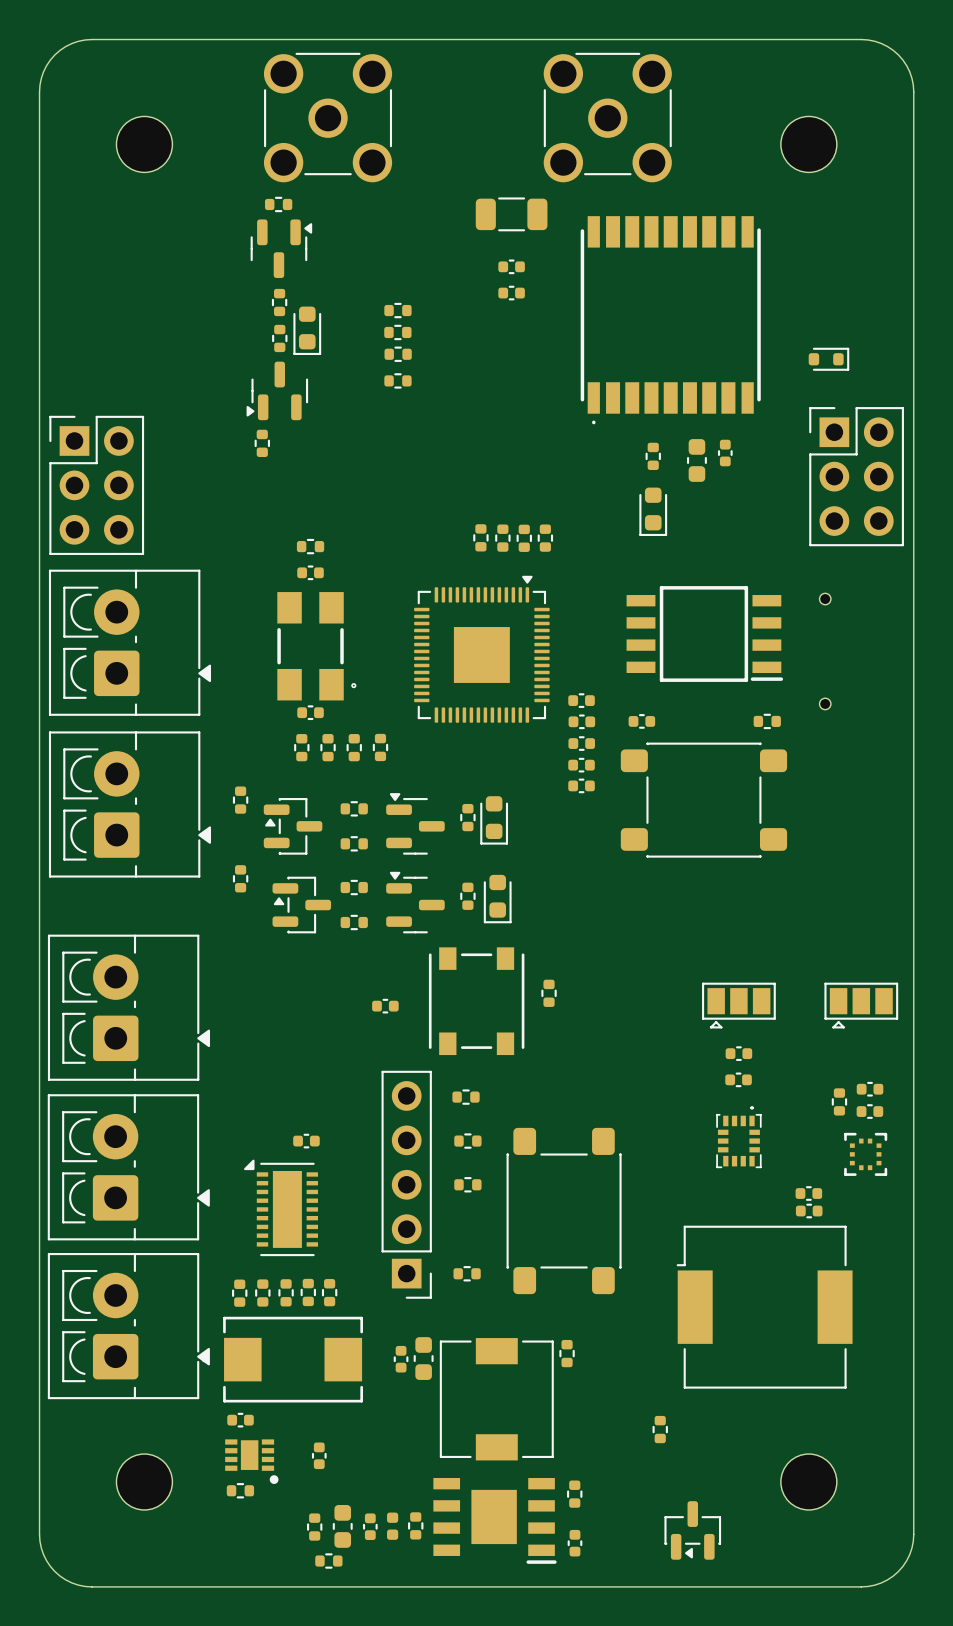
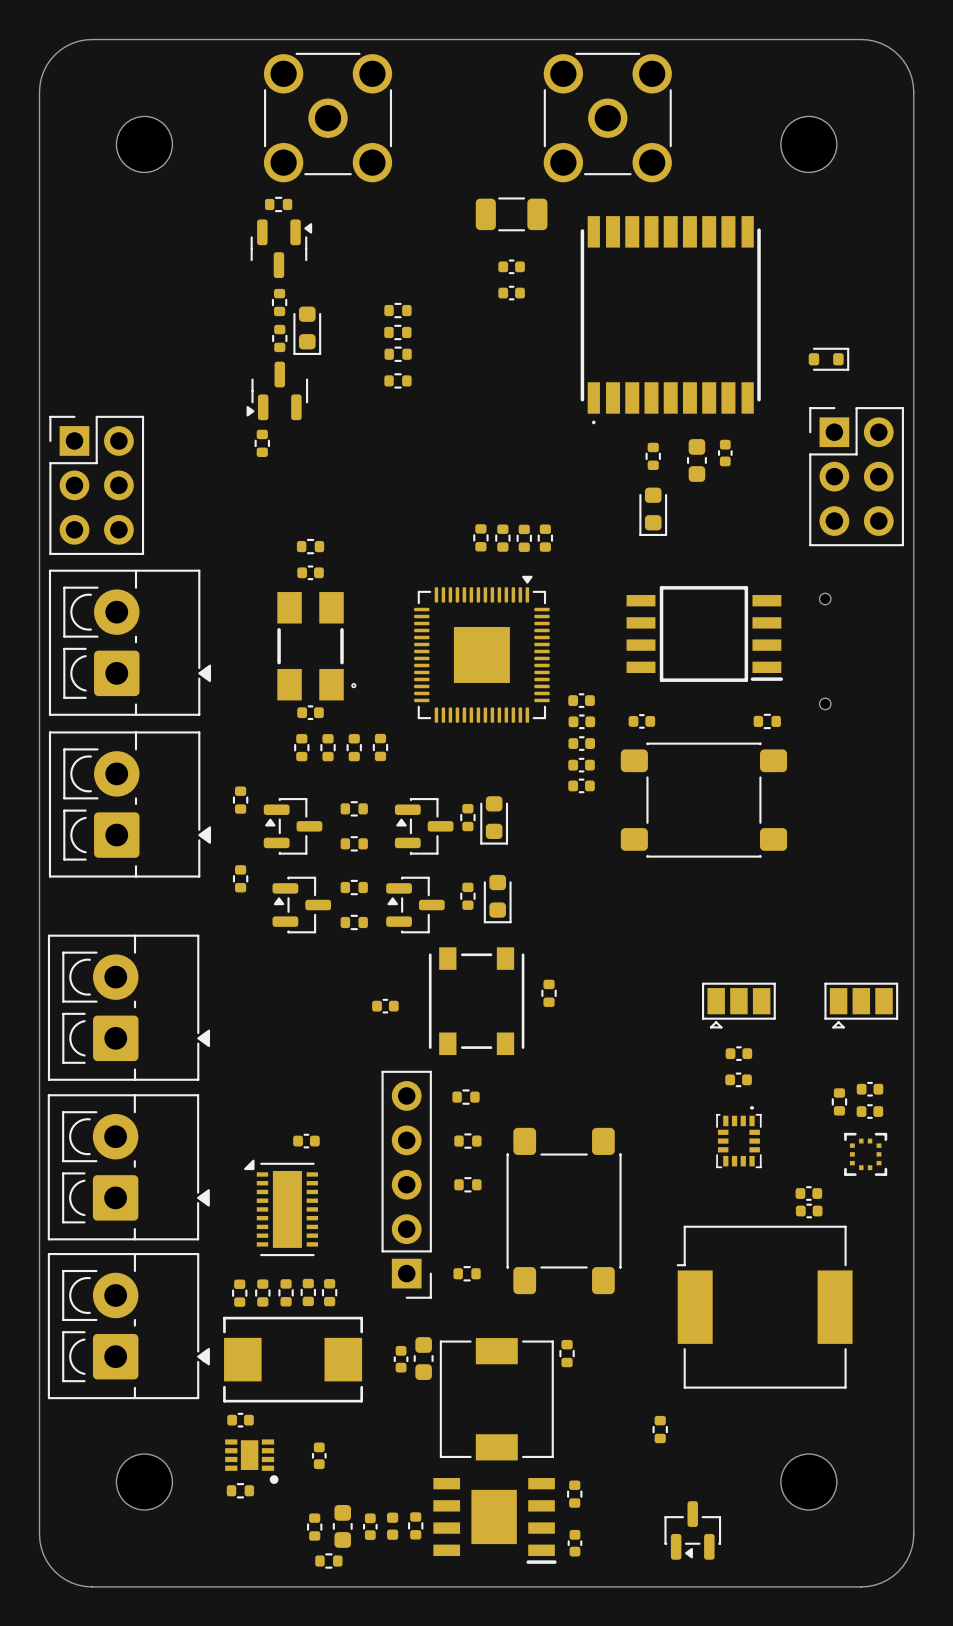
part footprint: [386, 793, 445, 855] -> [394, 798, 454, 855]
part footprint: [386, 871, 445, 934] -> [386, 876, 445, 934]

